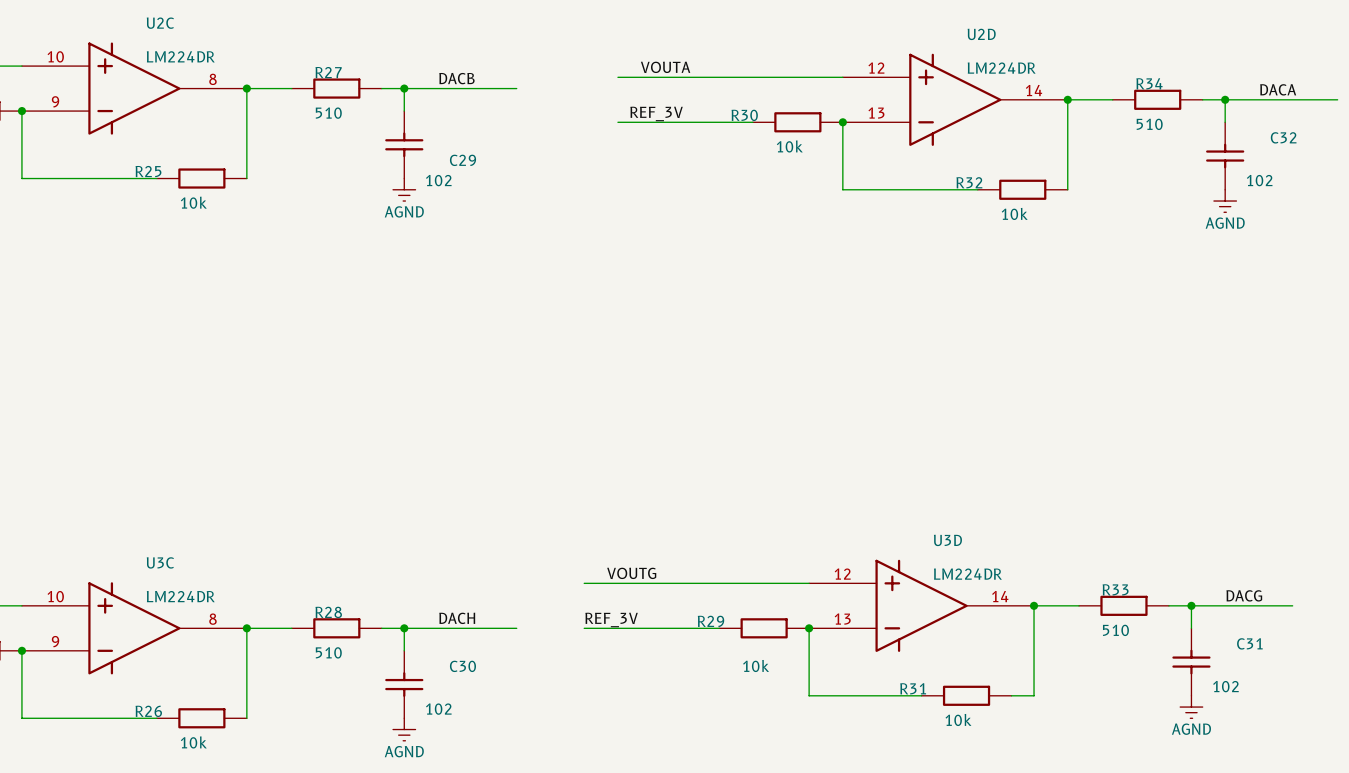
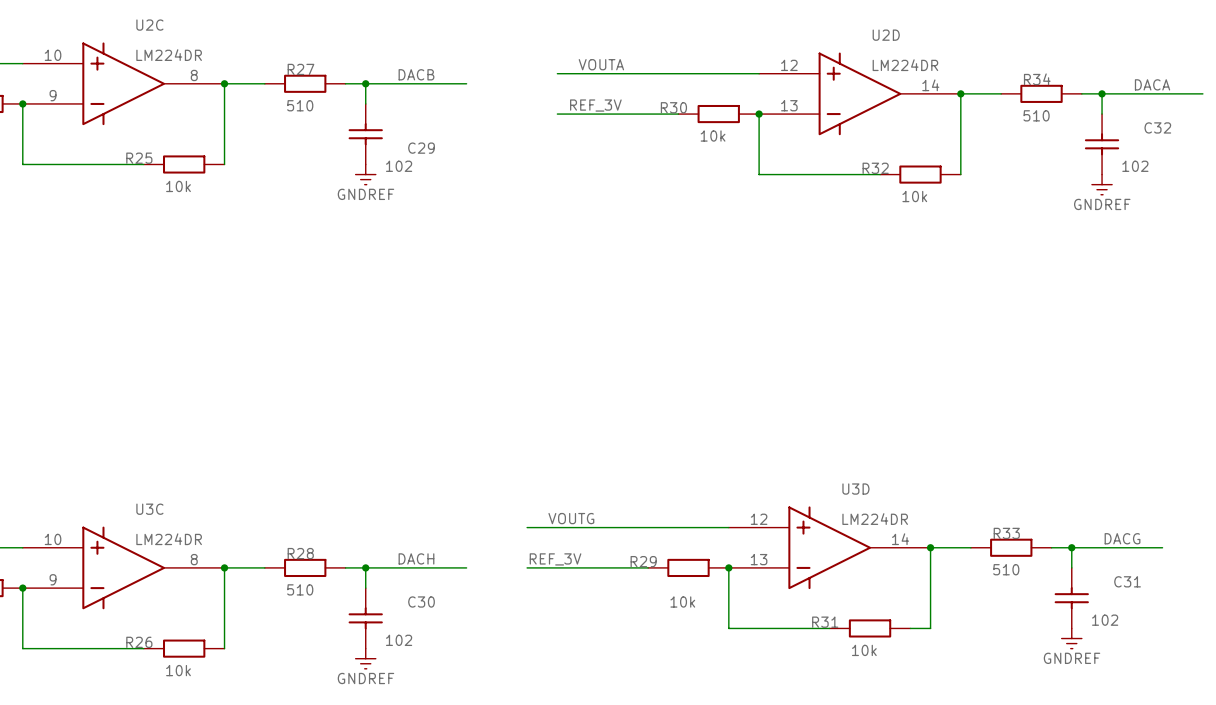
power symbol: AGND (404, 189) -> GNDREF (365, 174)
power symbol: AGND (1225, 201) -> GNDREF (1102, 184)
power symbol: AGND (1191, 707) -> GNDREF (1071, 638)
power symbol: AGND (404, 729) -> GNDREF (365, 658)

